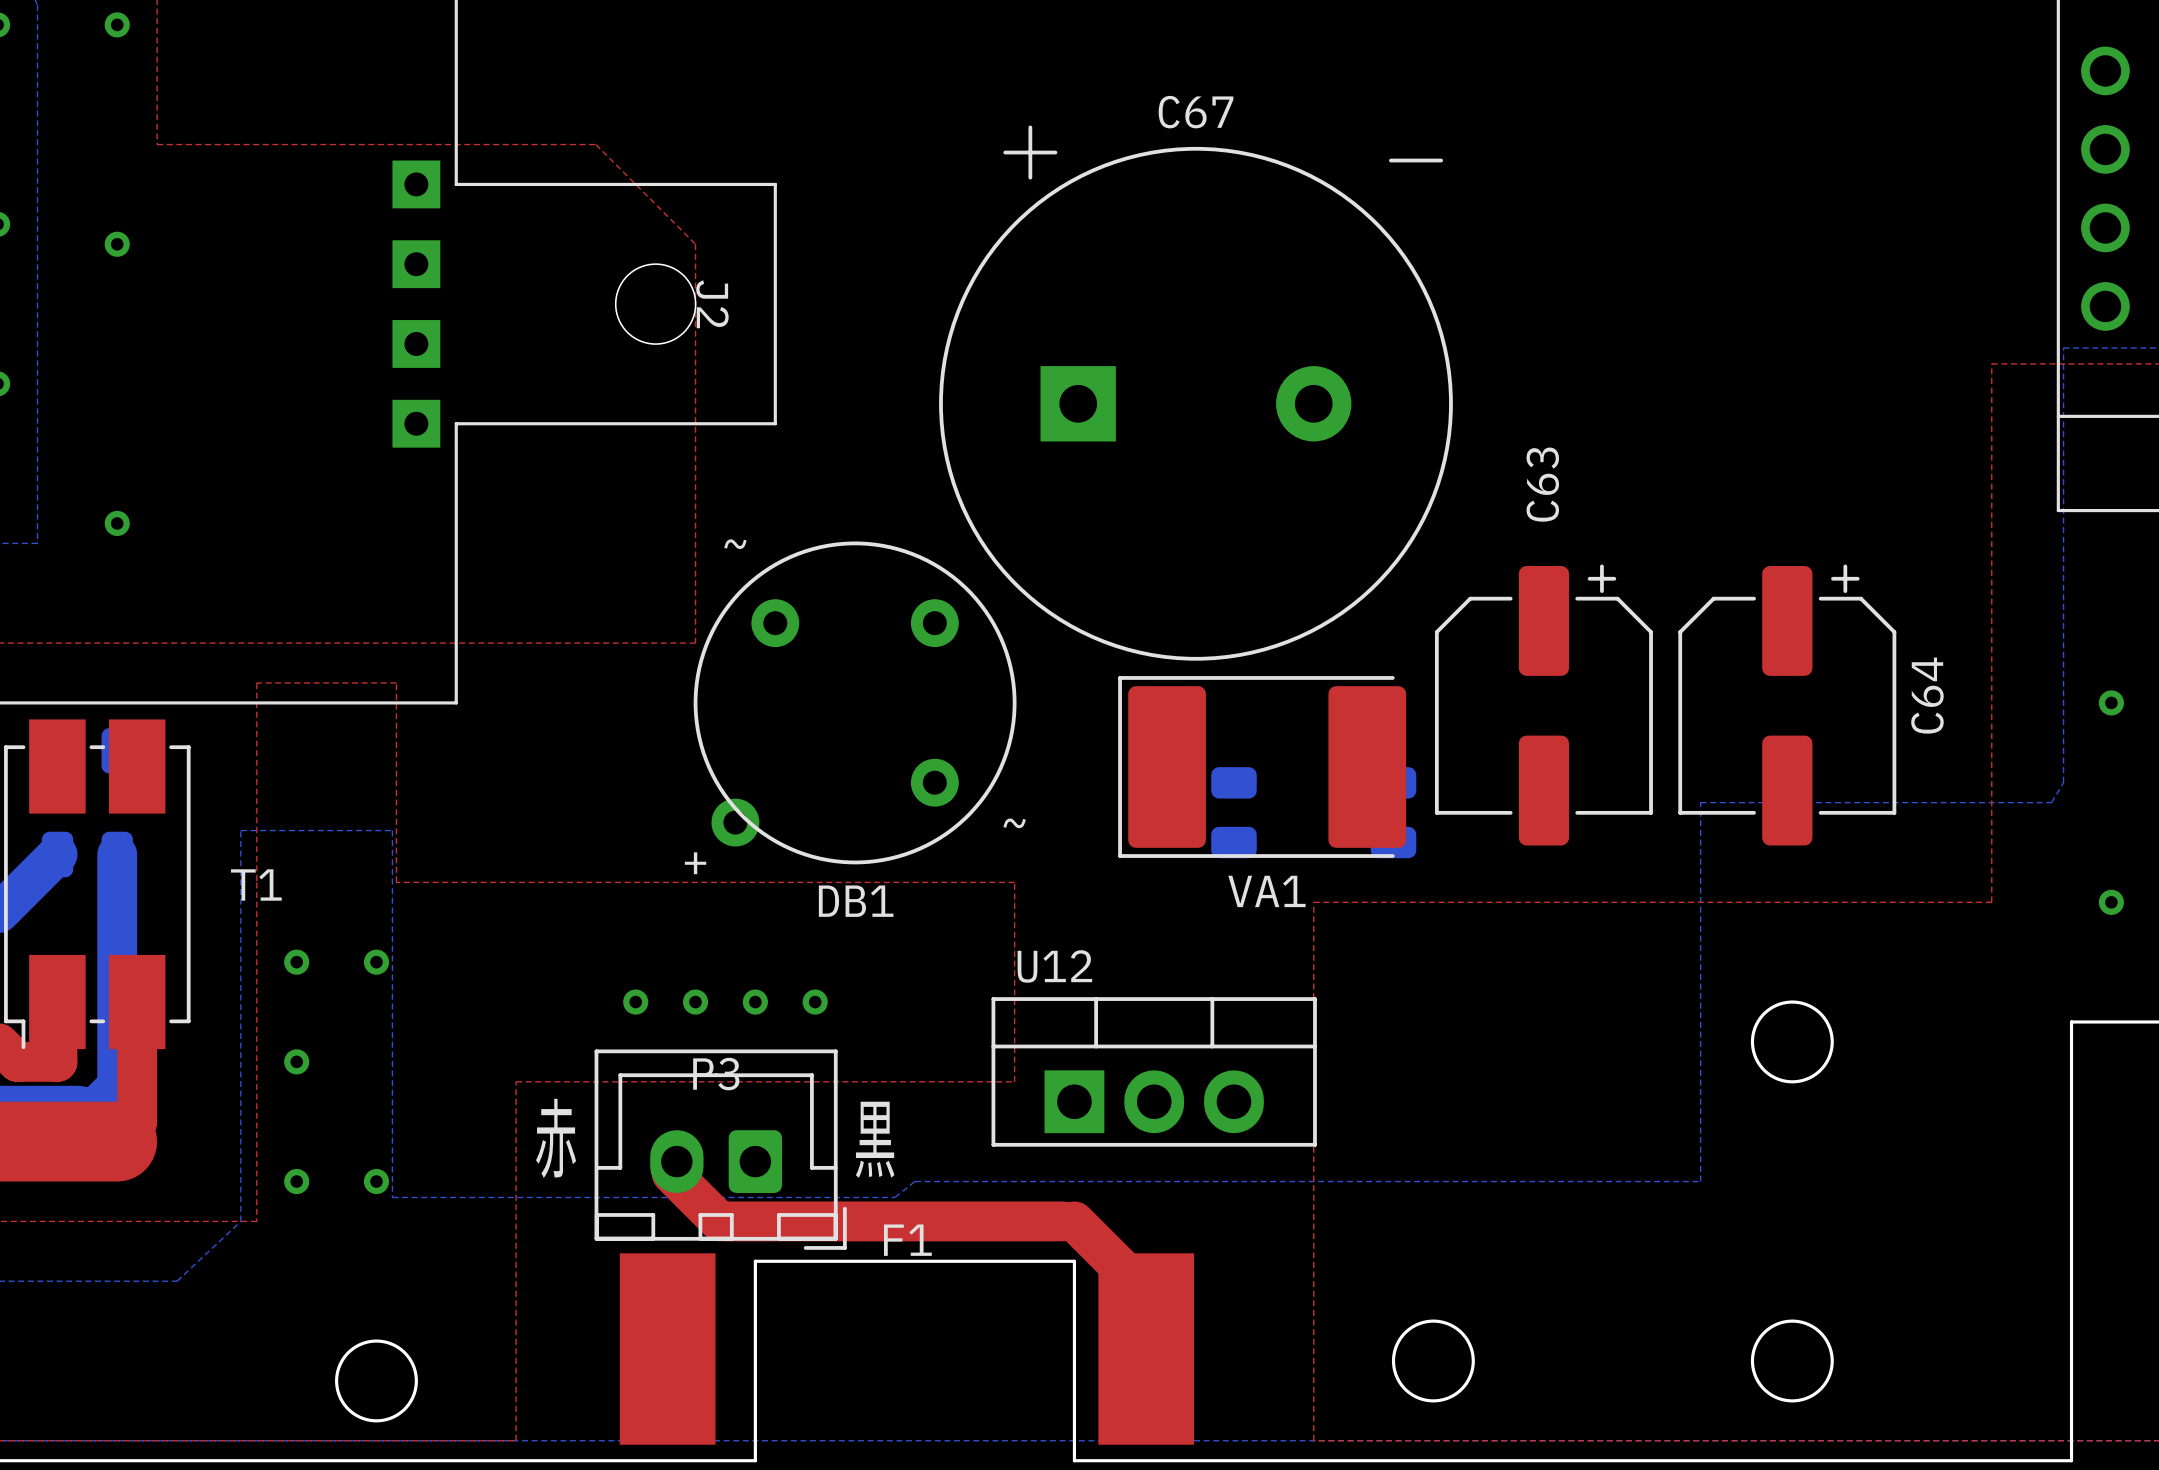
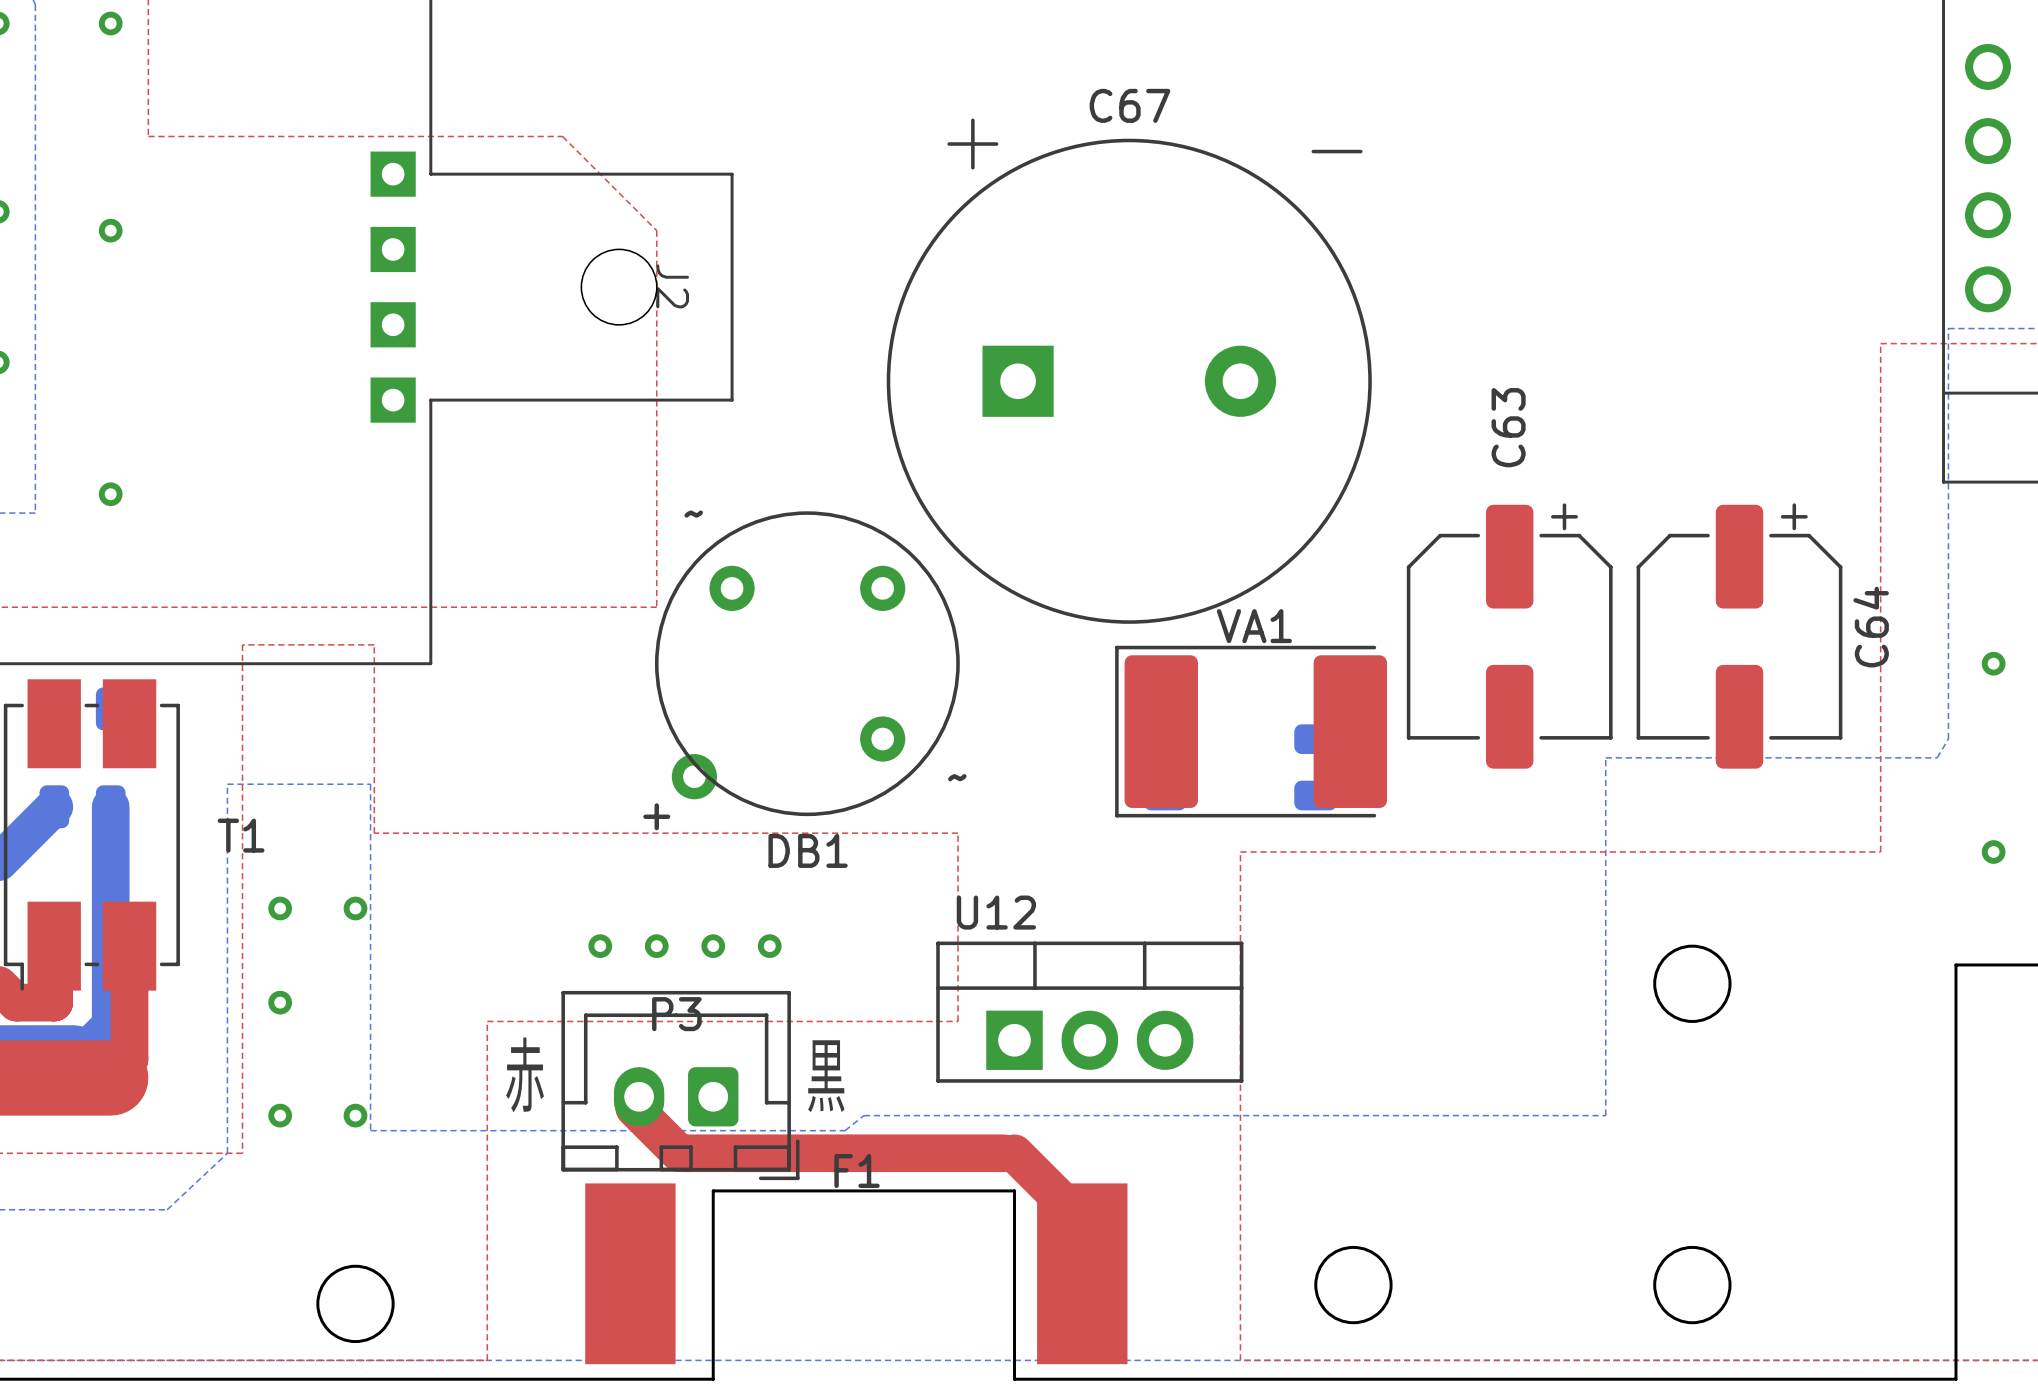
C63 position: (1543, 705) -> (1509, 636)
C64 position: (1787, 705) -> (1739, 636)
VA1 position: (1262, 766) -> (1251, 731)
VA1 name position: VA1 (1266, 891) -> VA1 (1254, 626)

